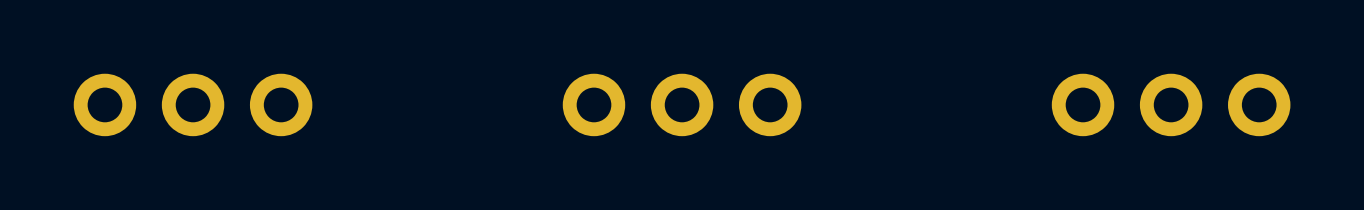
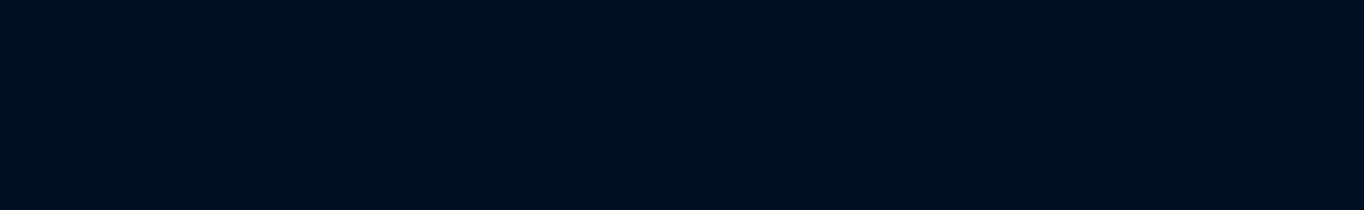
part: (193, 104) -> none
part: (682, 104) -> none
part: (1171, 104) -> none

